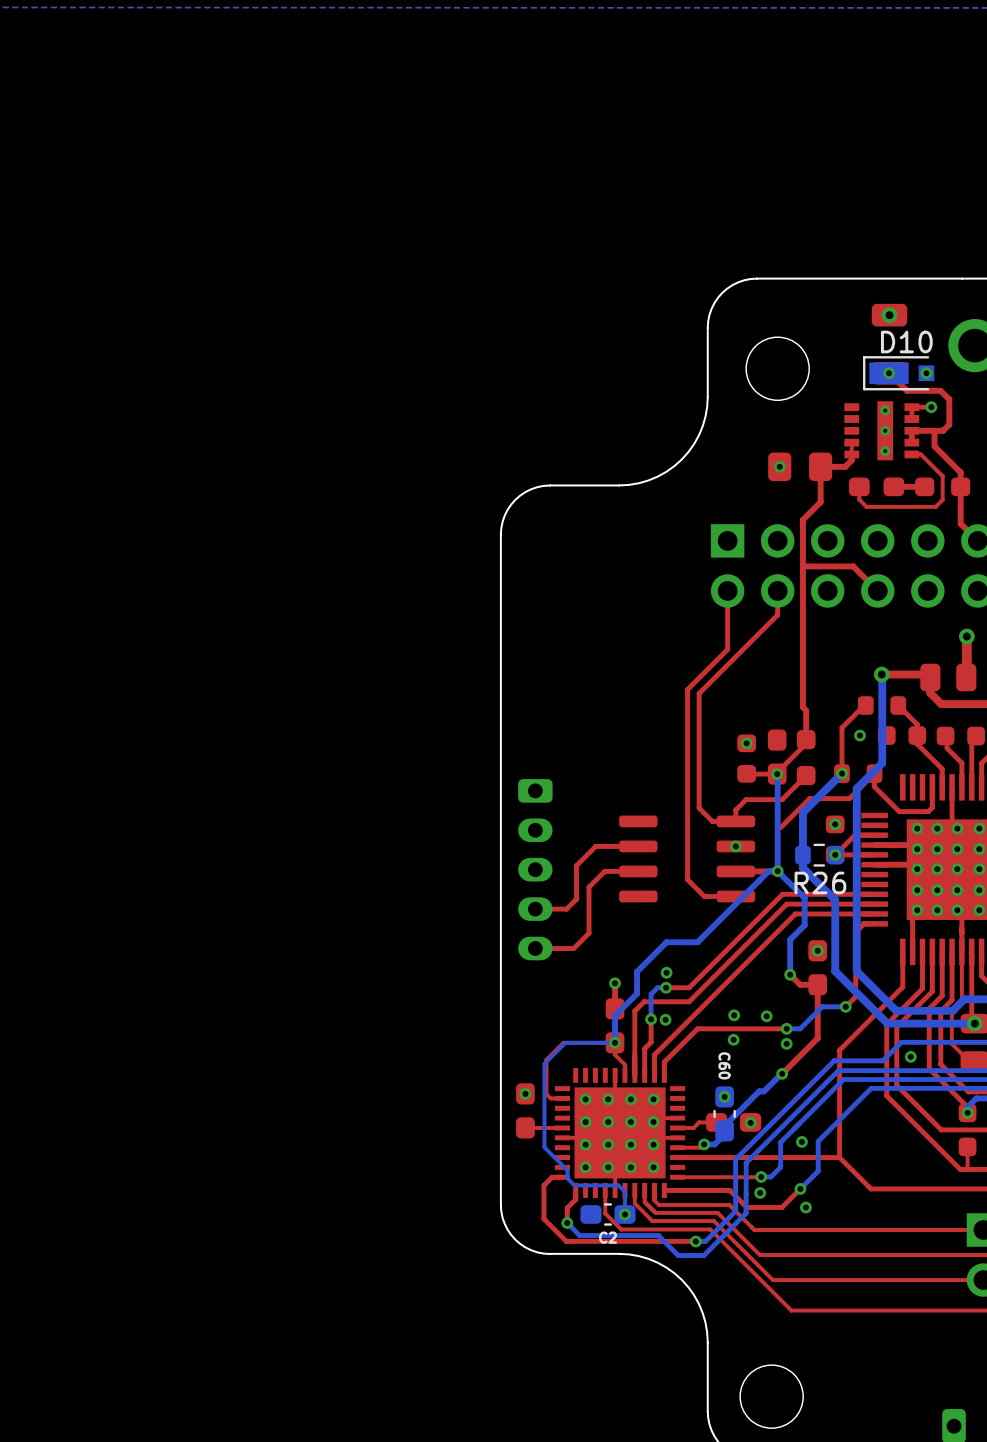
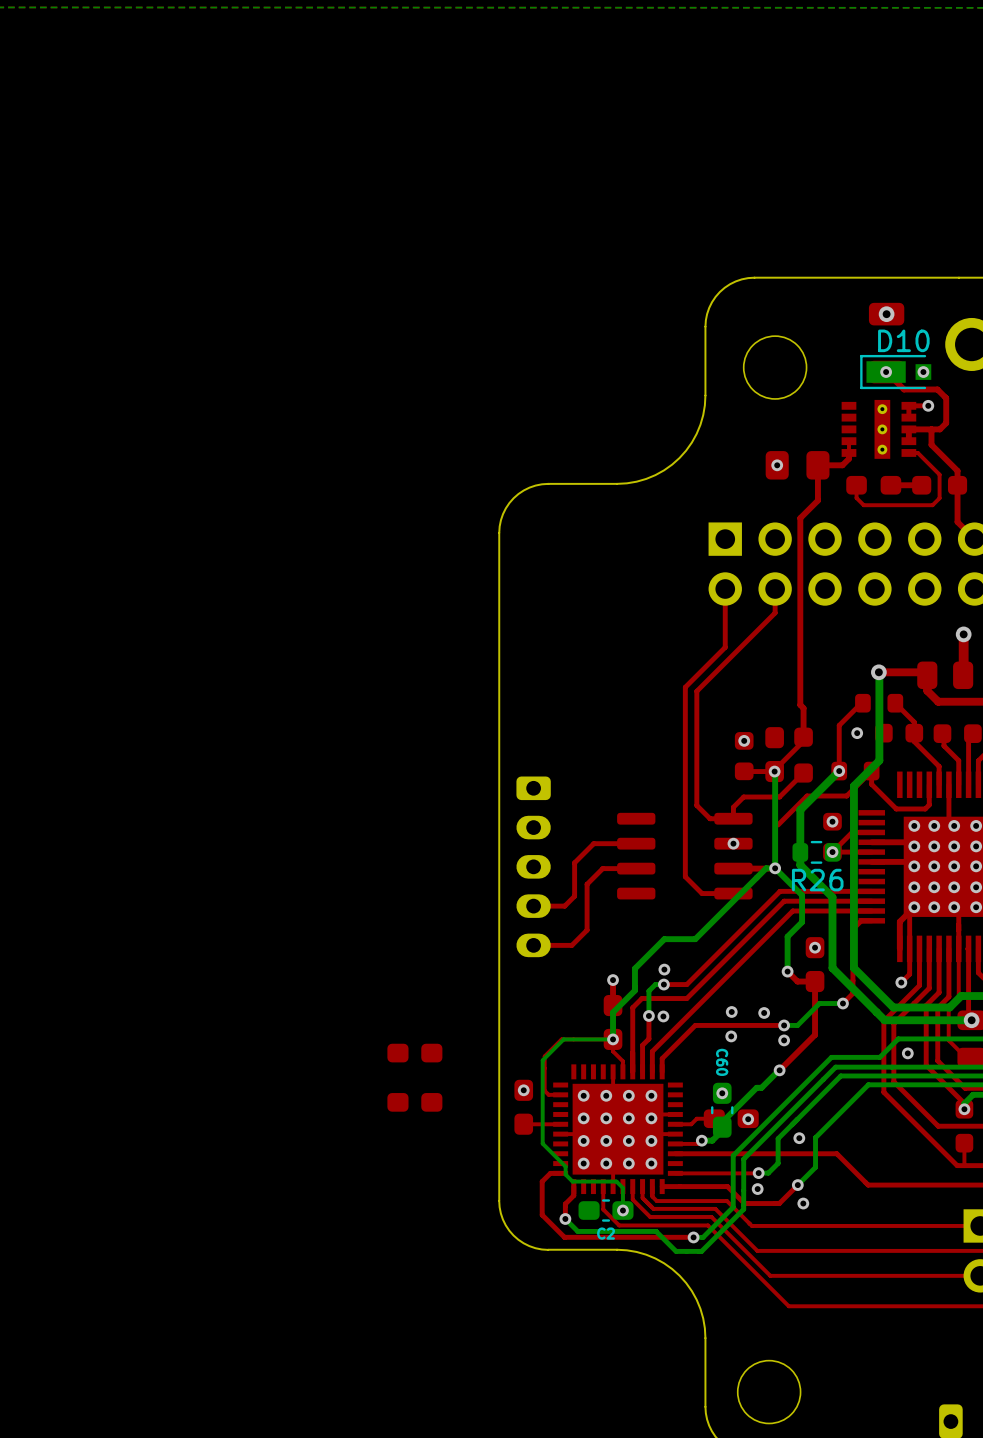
top track: (802, 566) (853, 566) (877, 590) -> none
top track: (902, 951) (902, 987) (839, 1050) (839, 1157) -> (899, 948) (899, 921) (914, 907)
top track: none -> (909, 948) (909, 974) (901, 982)
via: none -> (901, 982)
part: none -> (414, 1053)
part: none -> (414, 1102)

